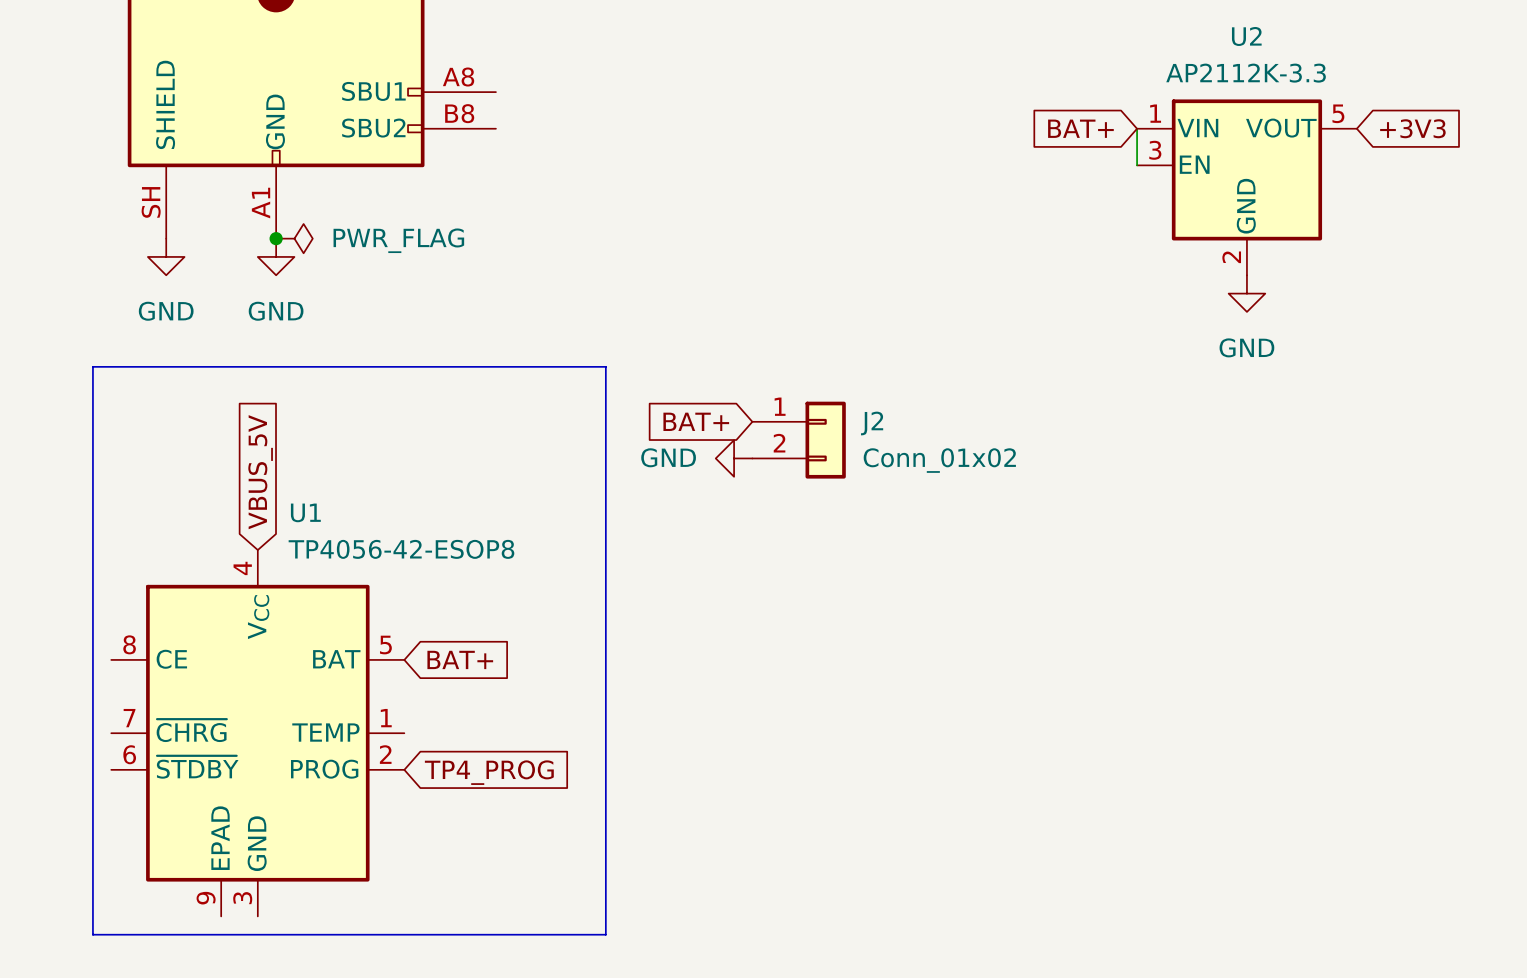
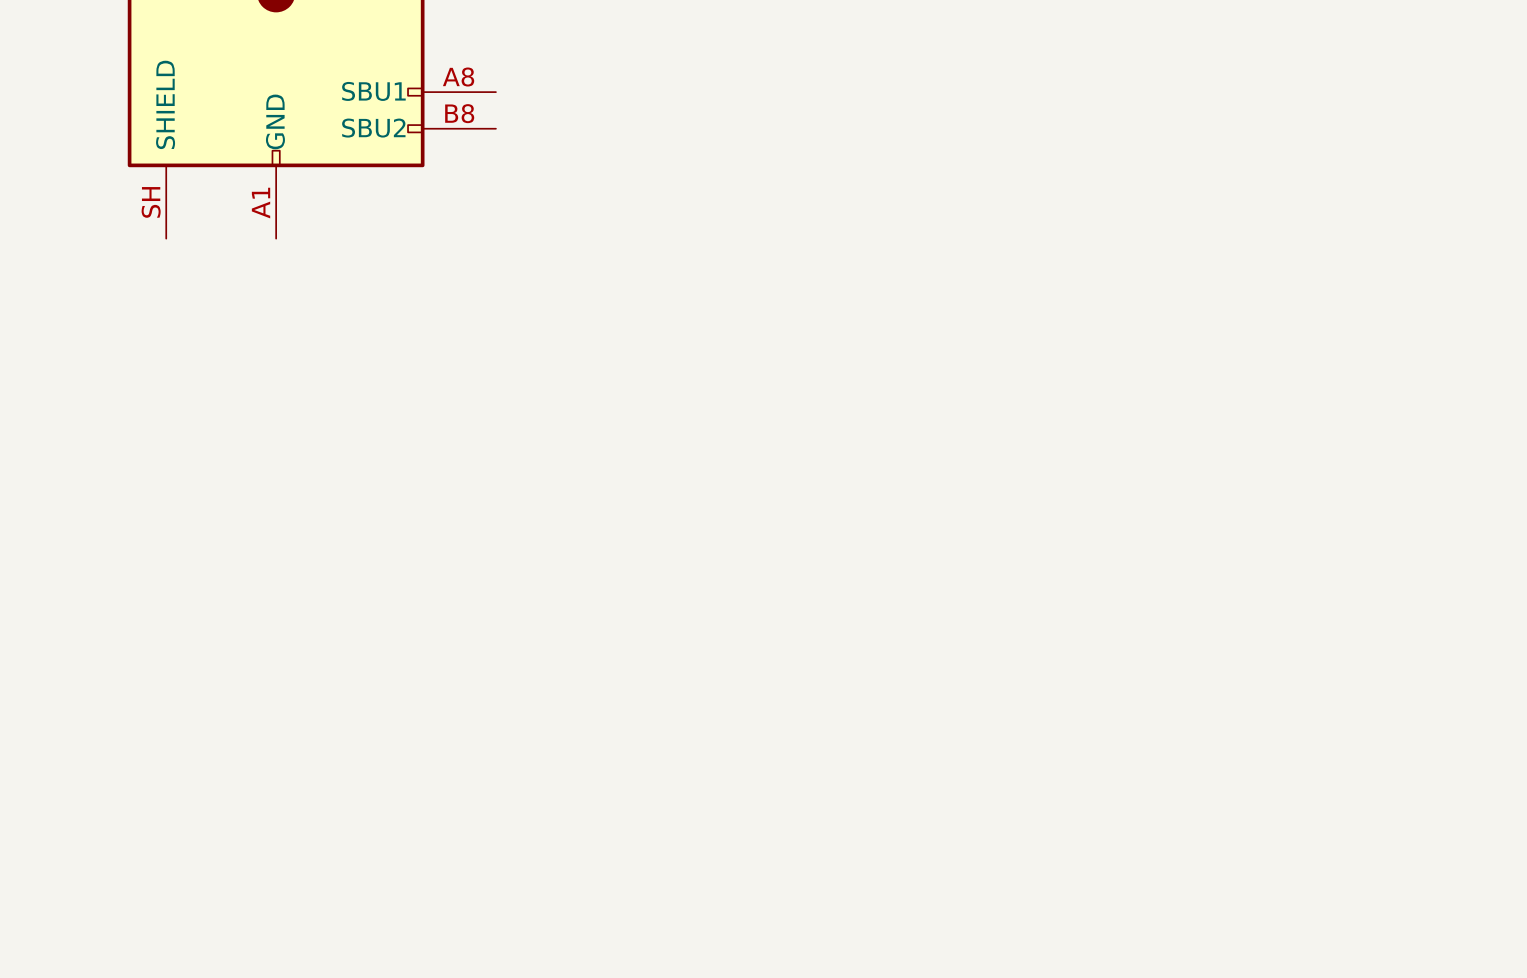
global label: BAT+ (1080, 128) -> none
wire: (1137, 128) (1137, 165) -> none
global label: +3V3 (1412, 128) -> none
U2: AP2112K-3.3 (1246, 187) -> none
junction: (276, 238) -> none
power symbol: PWR_FLAG (294, 238) -> none
power symbol: GND (166, 256) -> none
power symbol: GND (276, 256) -> none
power symbol: GND (1246, 293) -> none
line: (92, 366) (605, 366) (605, 934) (92, 934) (92, 366) -> none
global label: BAT+ (696, 421) -> none
J2: Conn_01x02 (799, 440) -> none
power symbol: GND (734, 458) -> none
global label: VBUS_5V (260, 472) -> none
global label: BAT+ (460, 659) -> none
U1: TP4056-42-ESOP8 (257, 733) -> none
global label: TP4_PROG (489, 772) -> none

